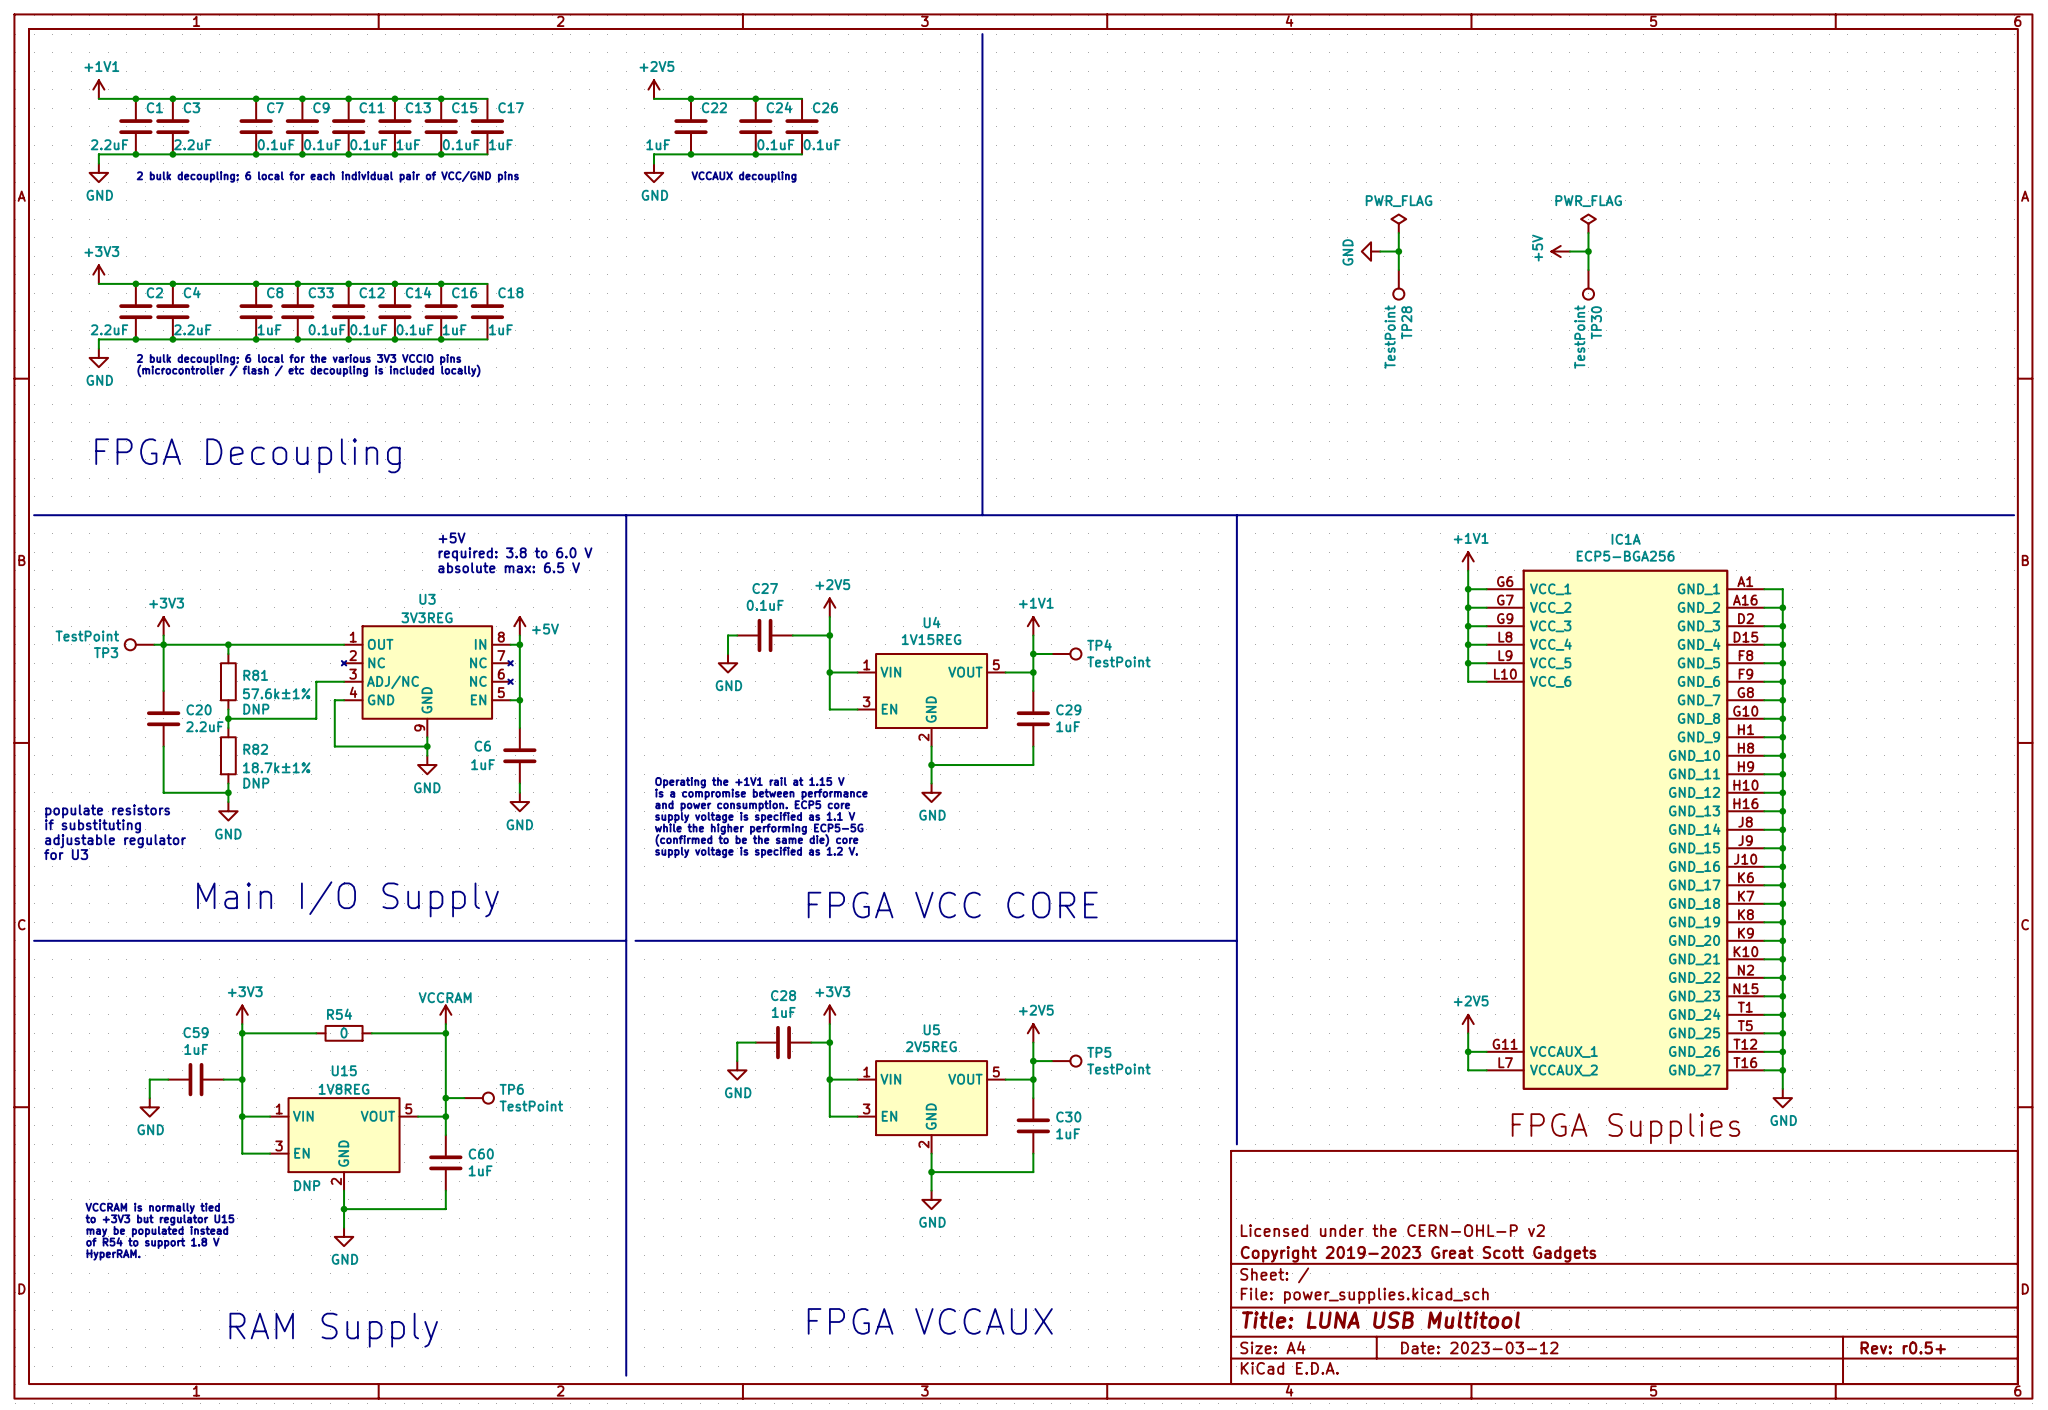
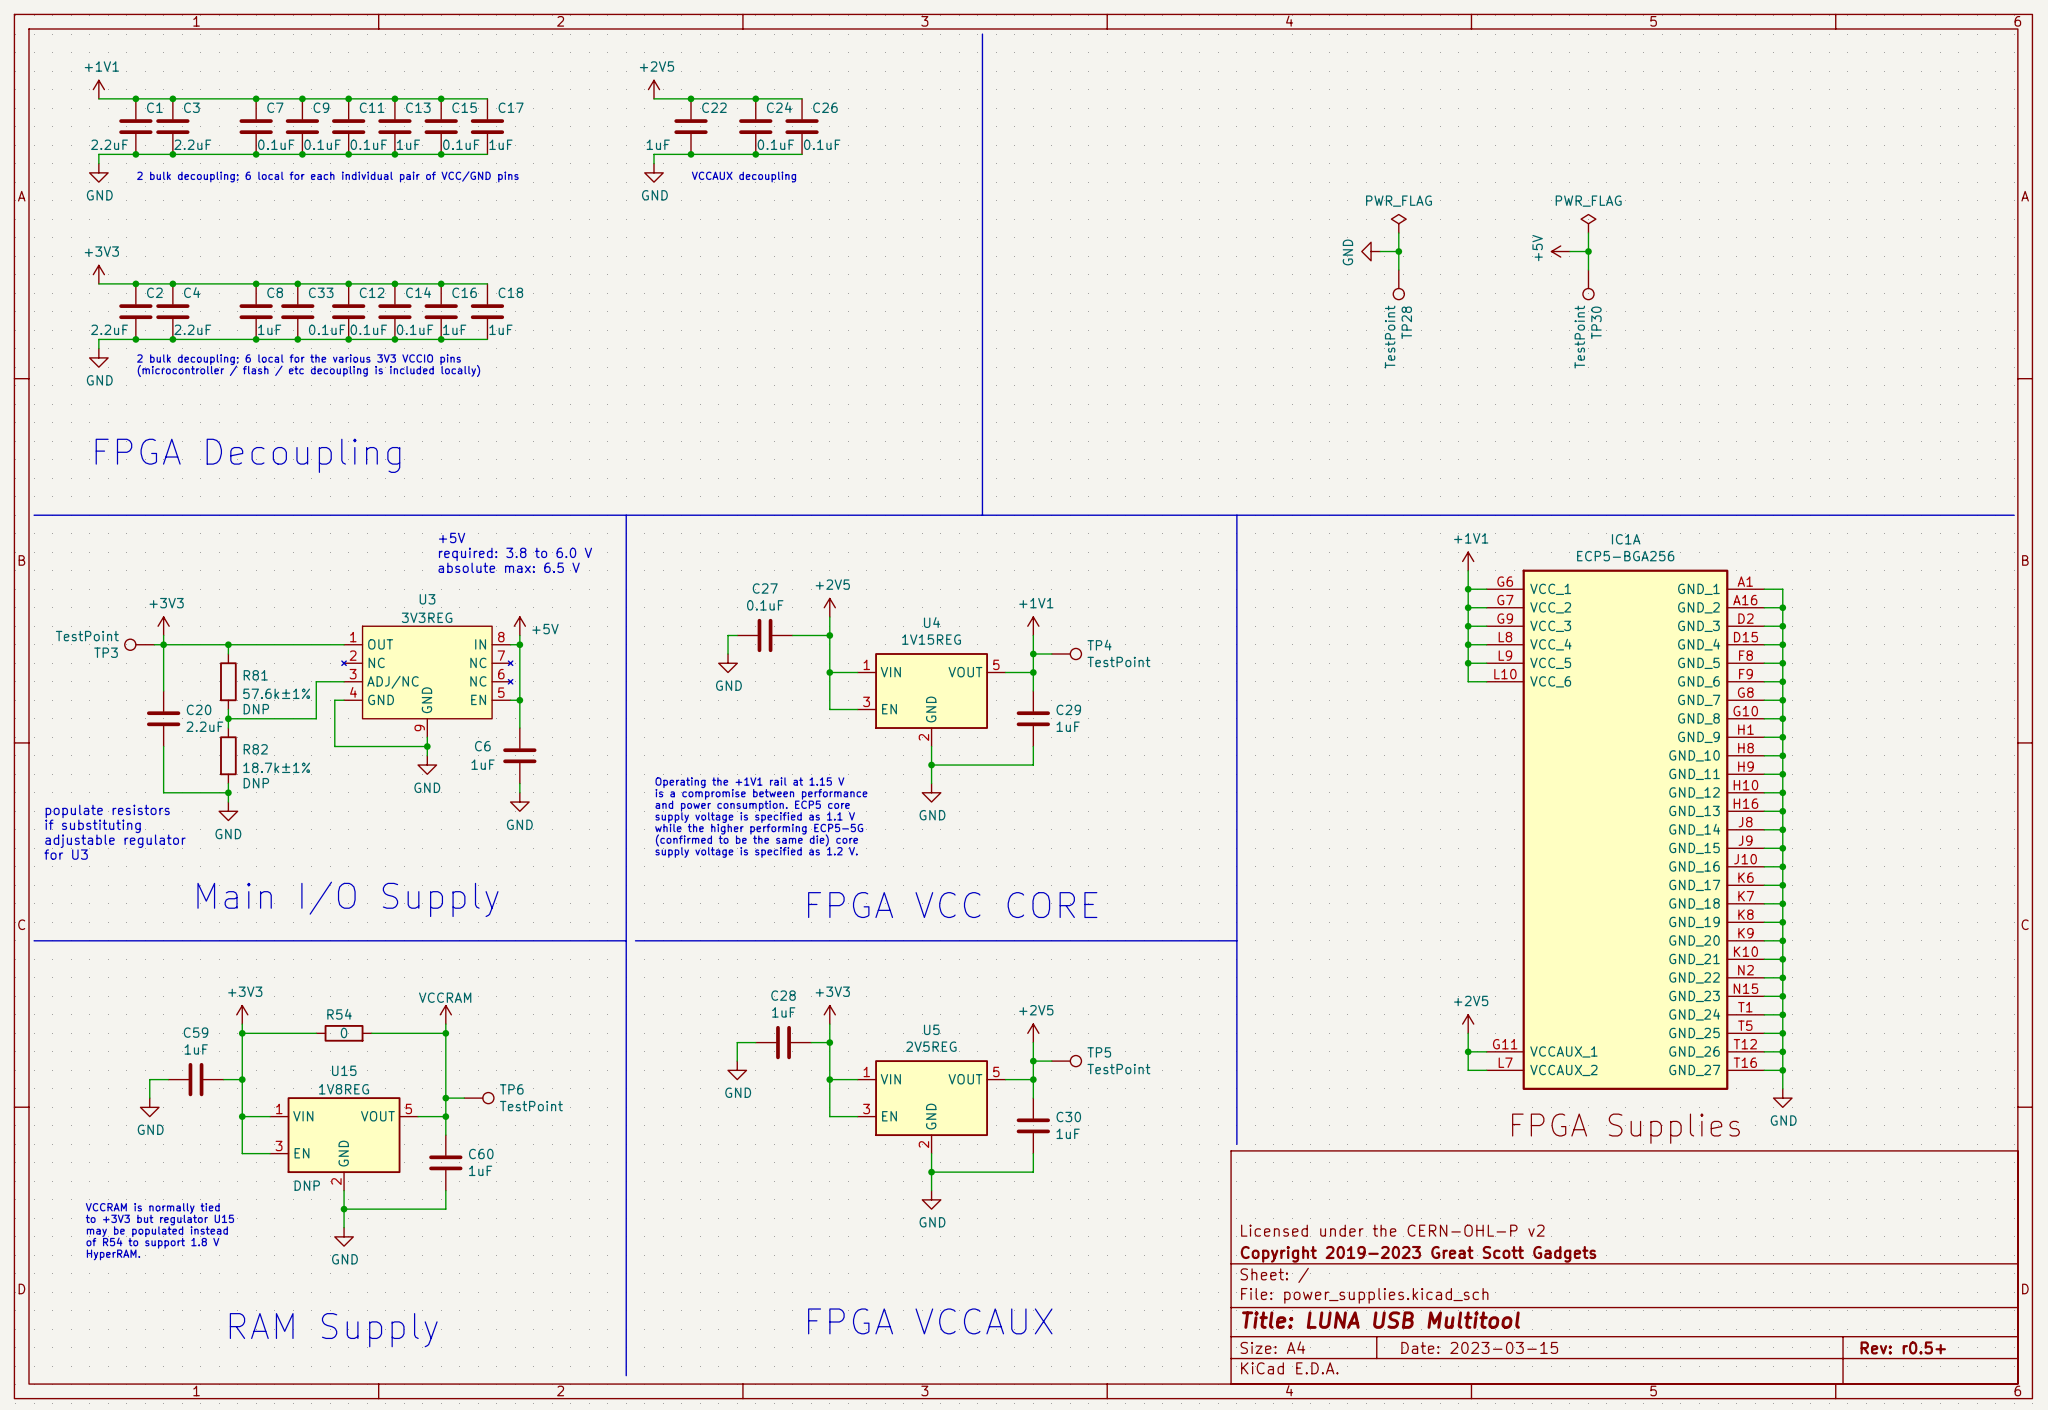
title block: Date: 2023-03-12 (1479, 1347) -> Date: 2023-03-15 (1479, 1347)

